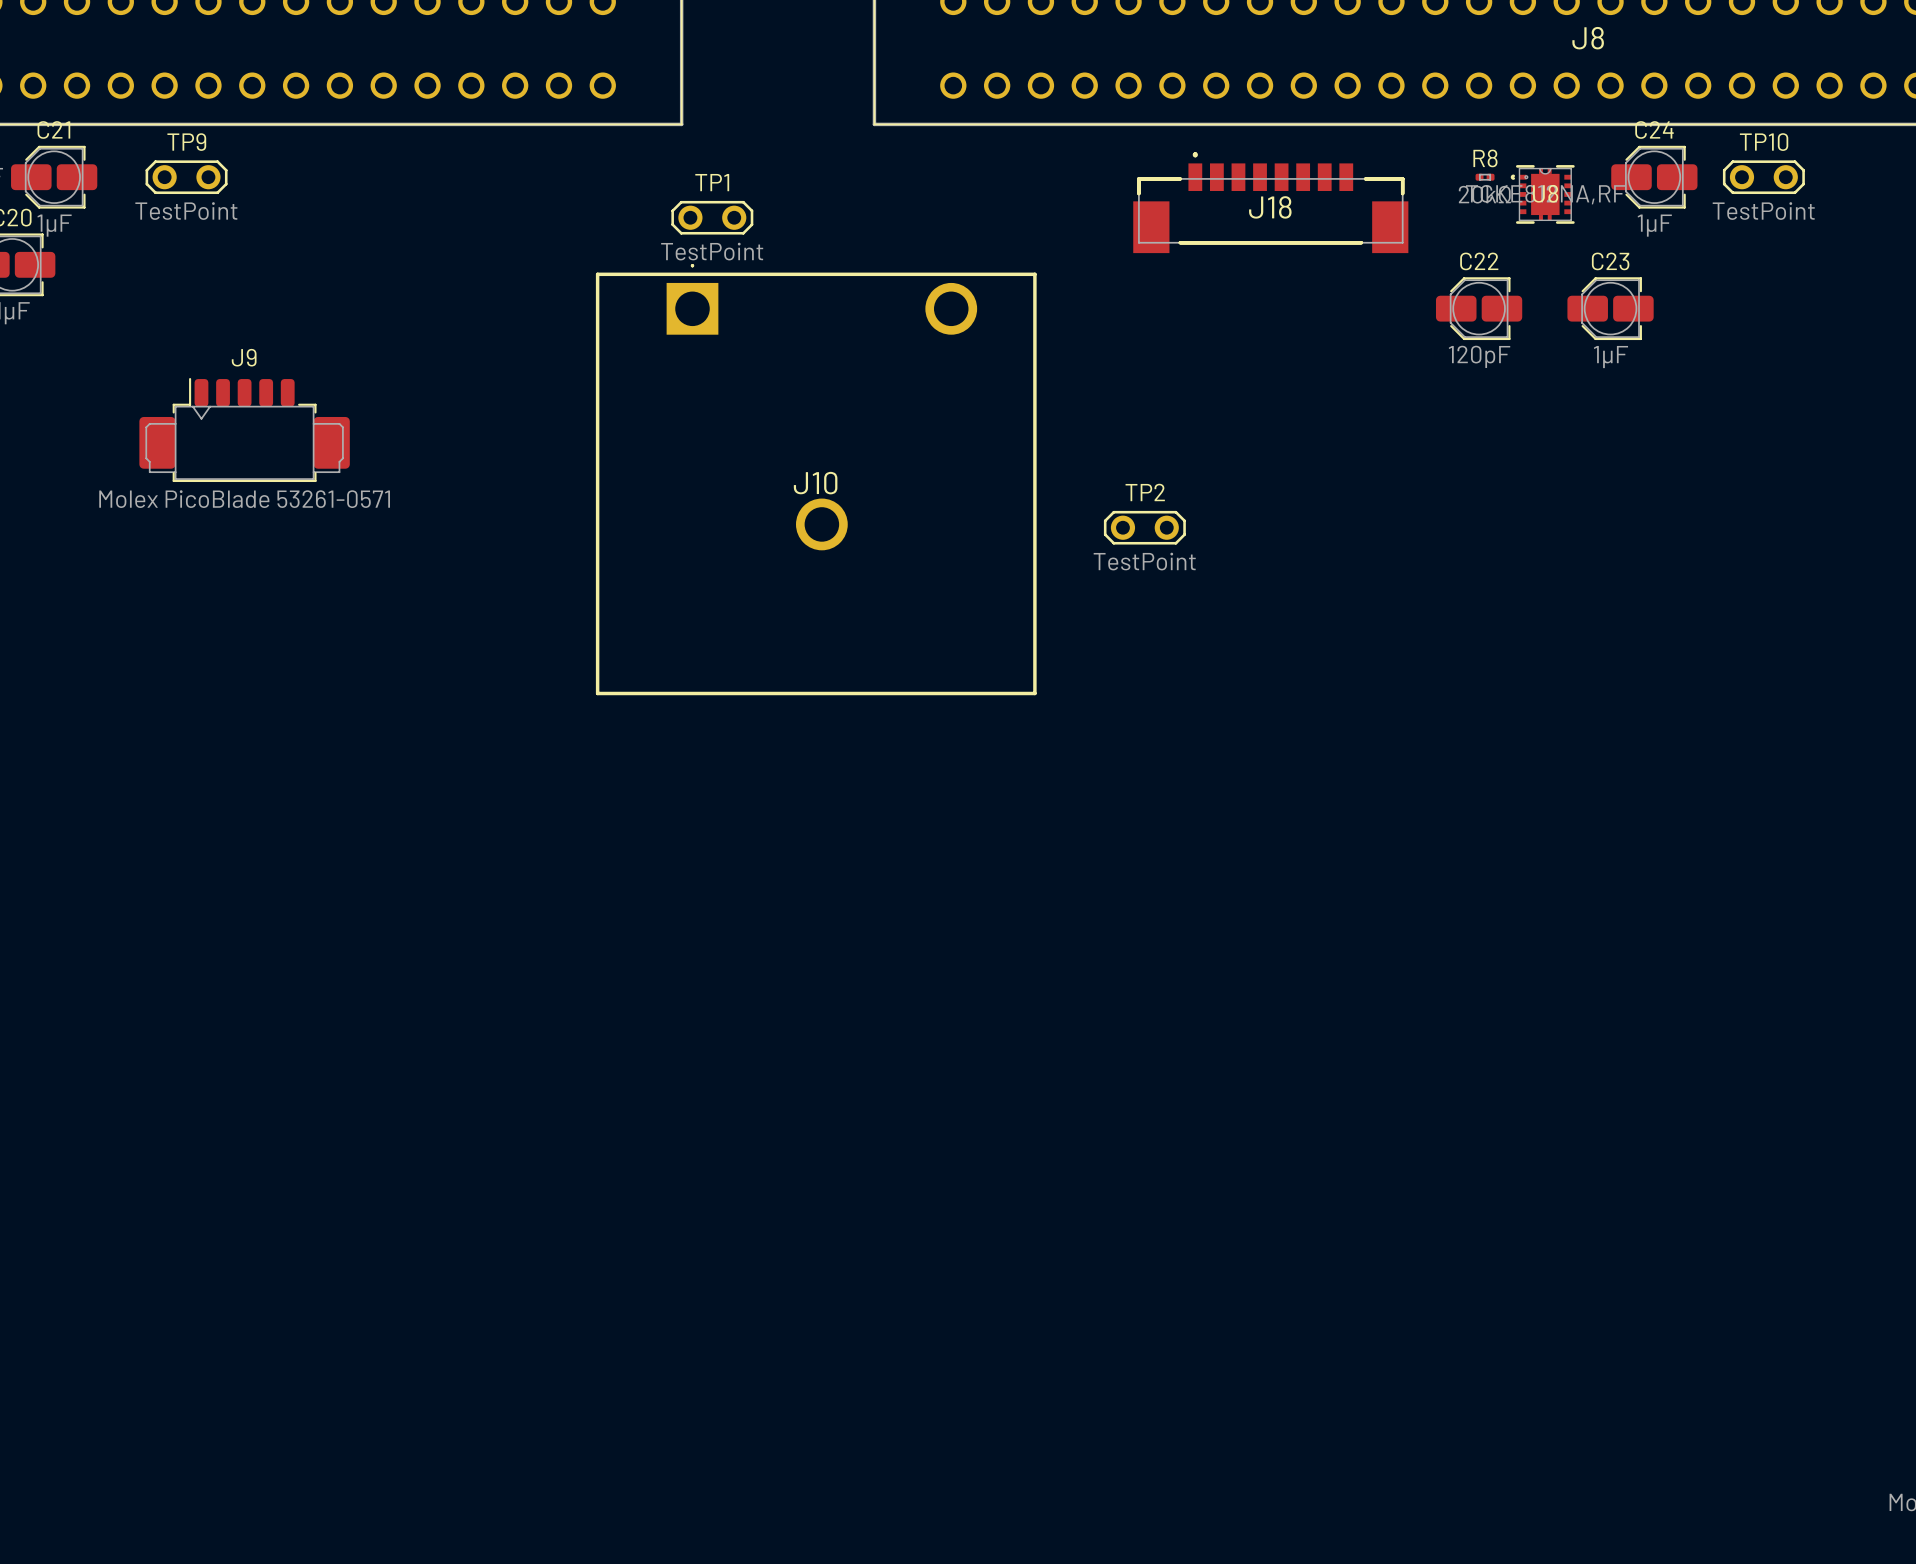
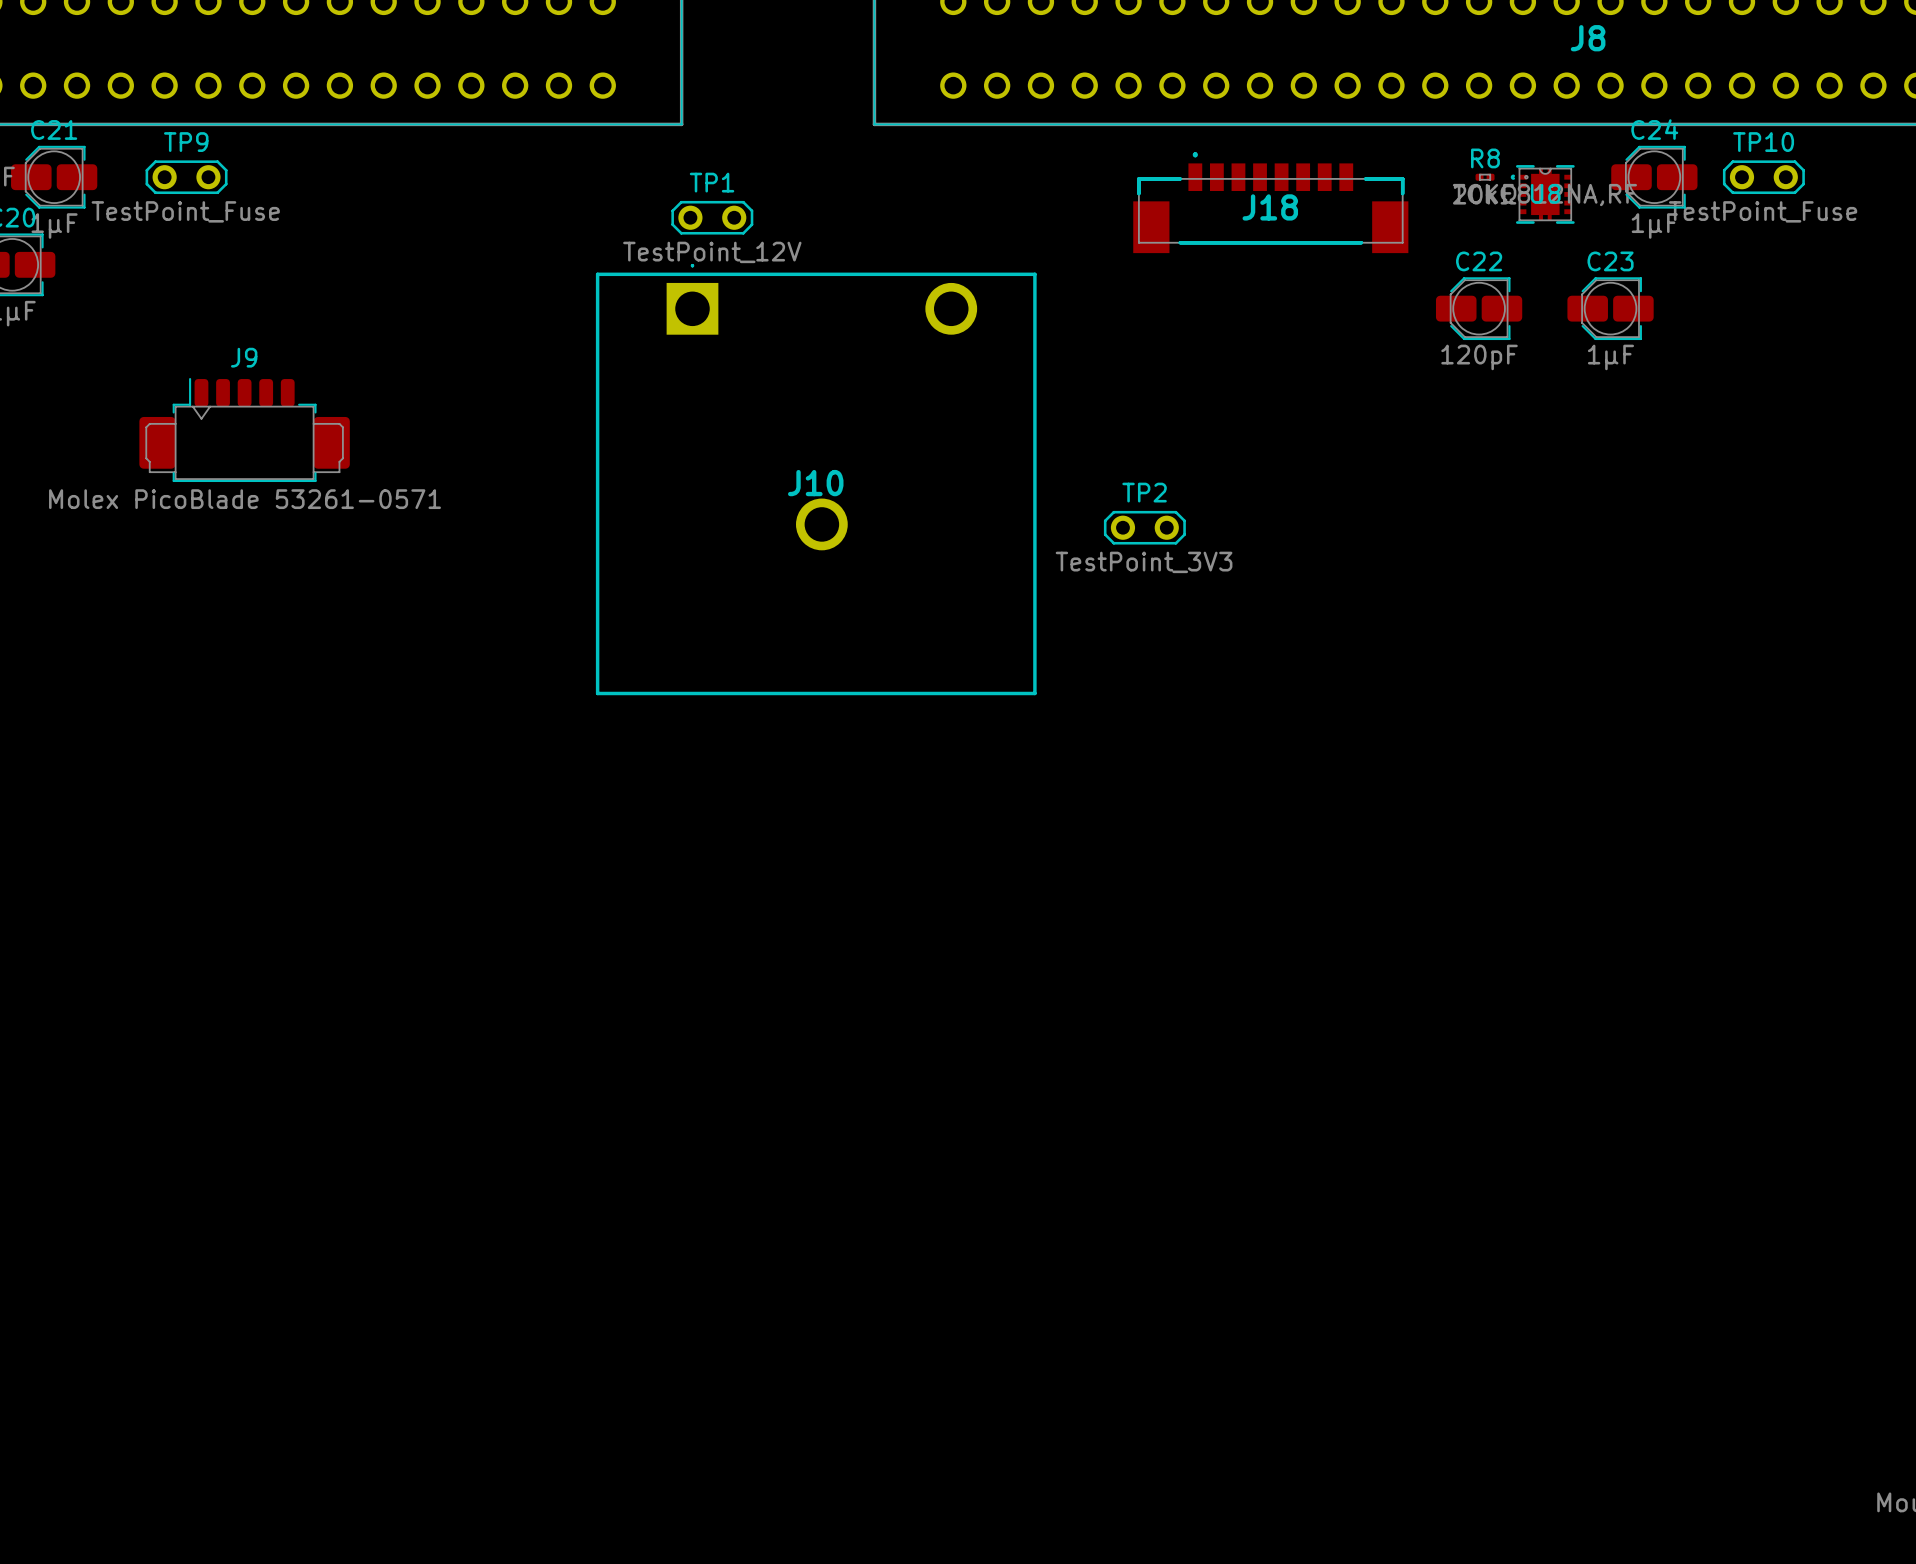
TP9 value: TestPoint (186, 211) -> TestPoint_Fuse (185, 211)
TP10 value: TestPoint (1763, 211) -> TestPoint_Fuse (1763, 211)
TP1 value: TestPoint (712, 251) -> TestPoint_12V (712, 252)
TP2 value: TestPoint (1144, 561) -> TestPoint_3V3 (1144, 562)

